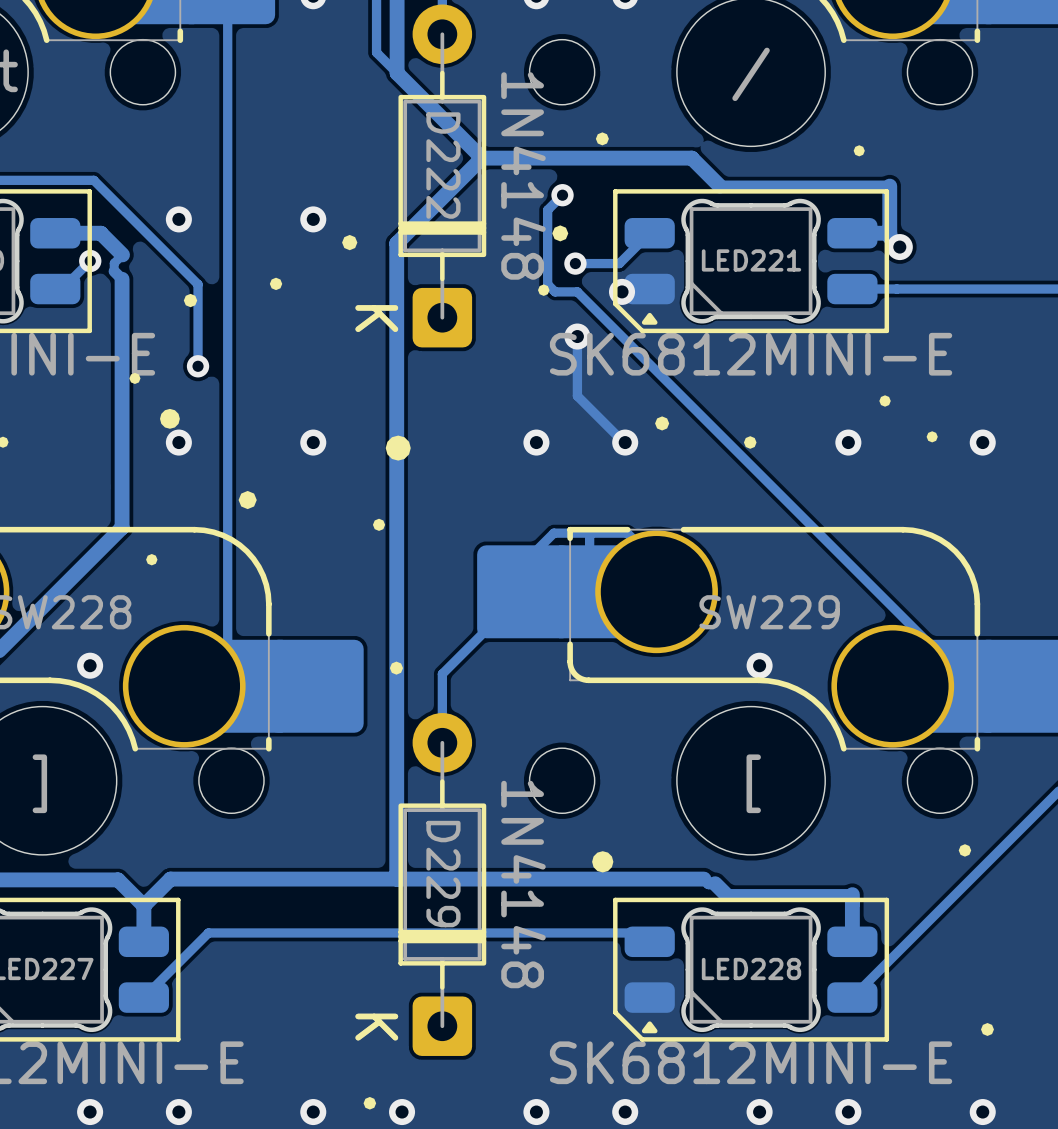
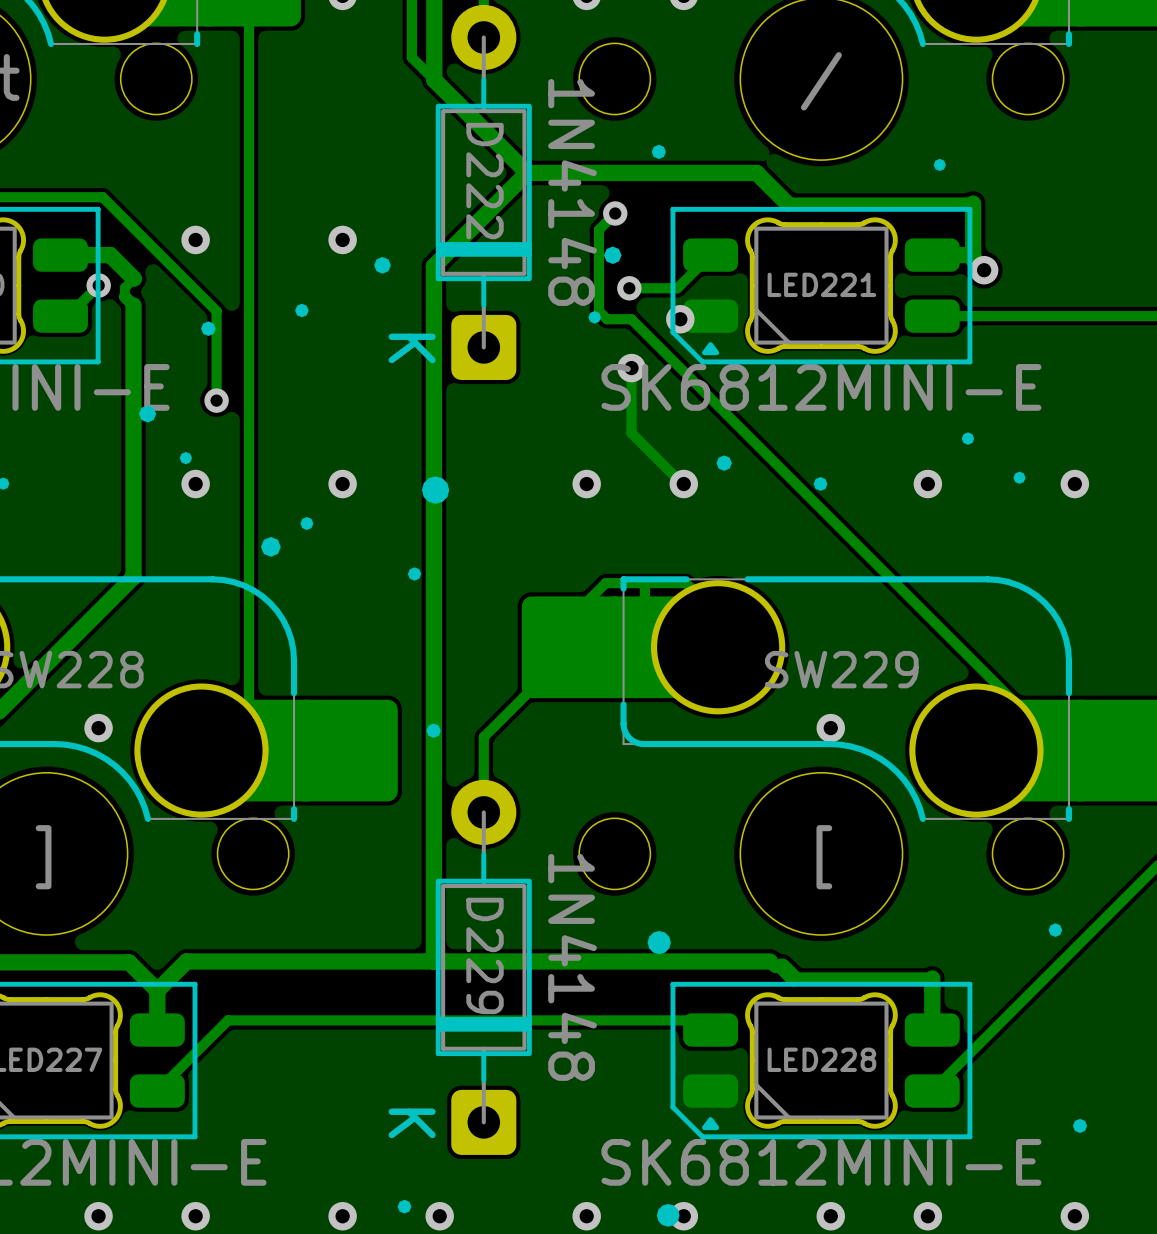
drawing: none -> [138, 405, 157, 423]
drawing position: (134, 378) -> (185, 458)
drawing position: (169, 418) -> (668, 1215)
drawing: none -> [300, 516, 314, 530]
drawing: [146, 553, 158, 566] -> none

